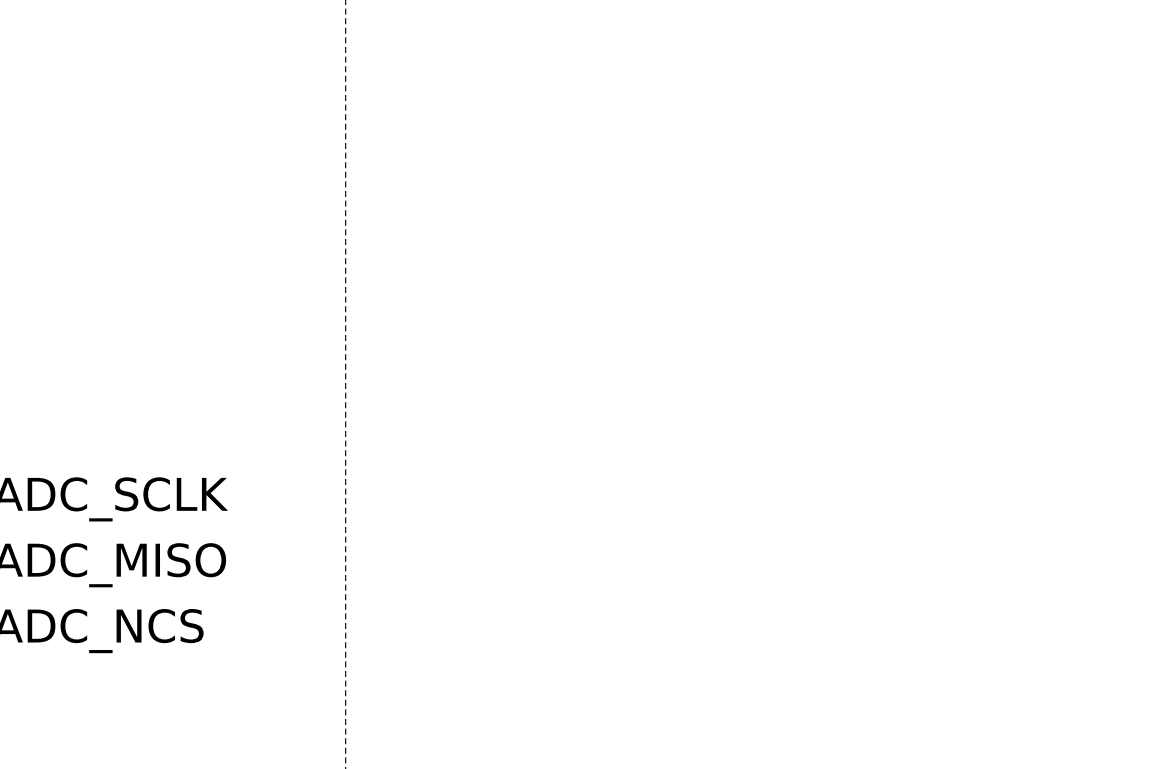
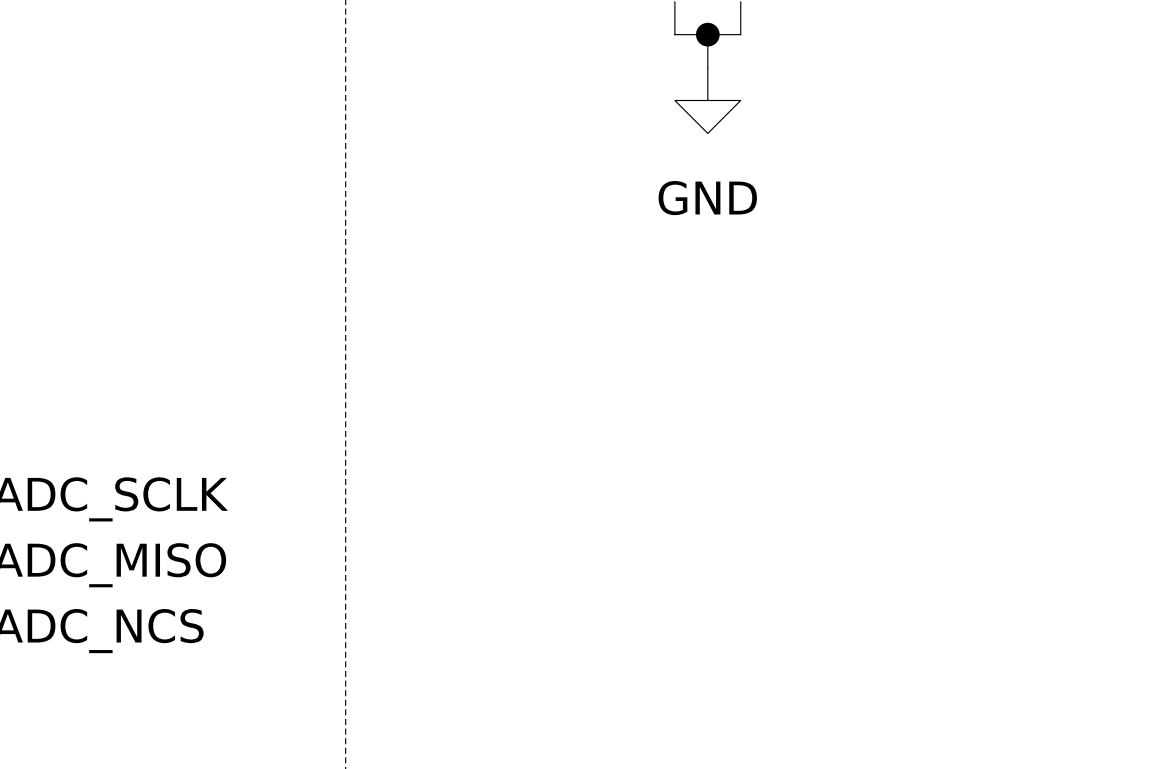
wire: none -> (674, 1) (674, 34) (740, 34) (740, 1)
wire: none -> (707, 34) (707, 67)
junction: none -> (707, 34)
power symbol: none -> GND (707, 100)

